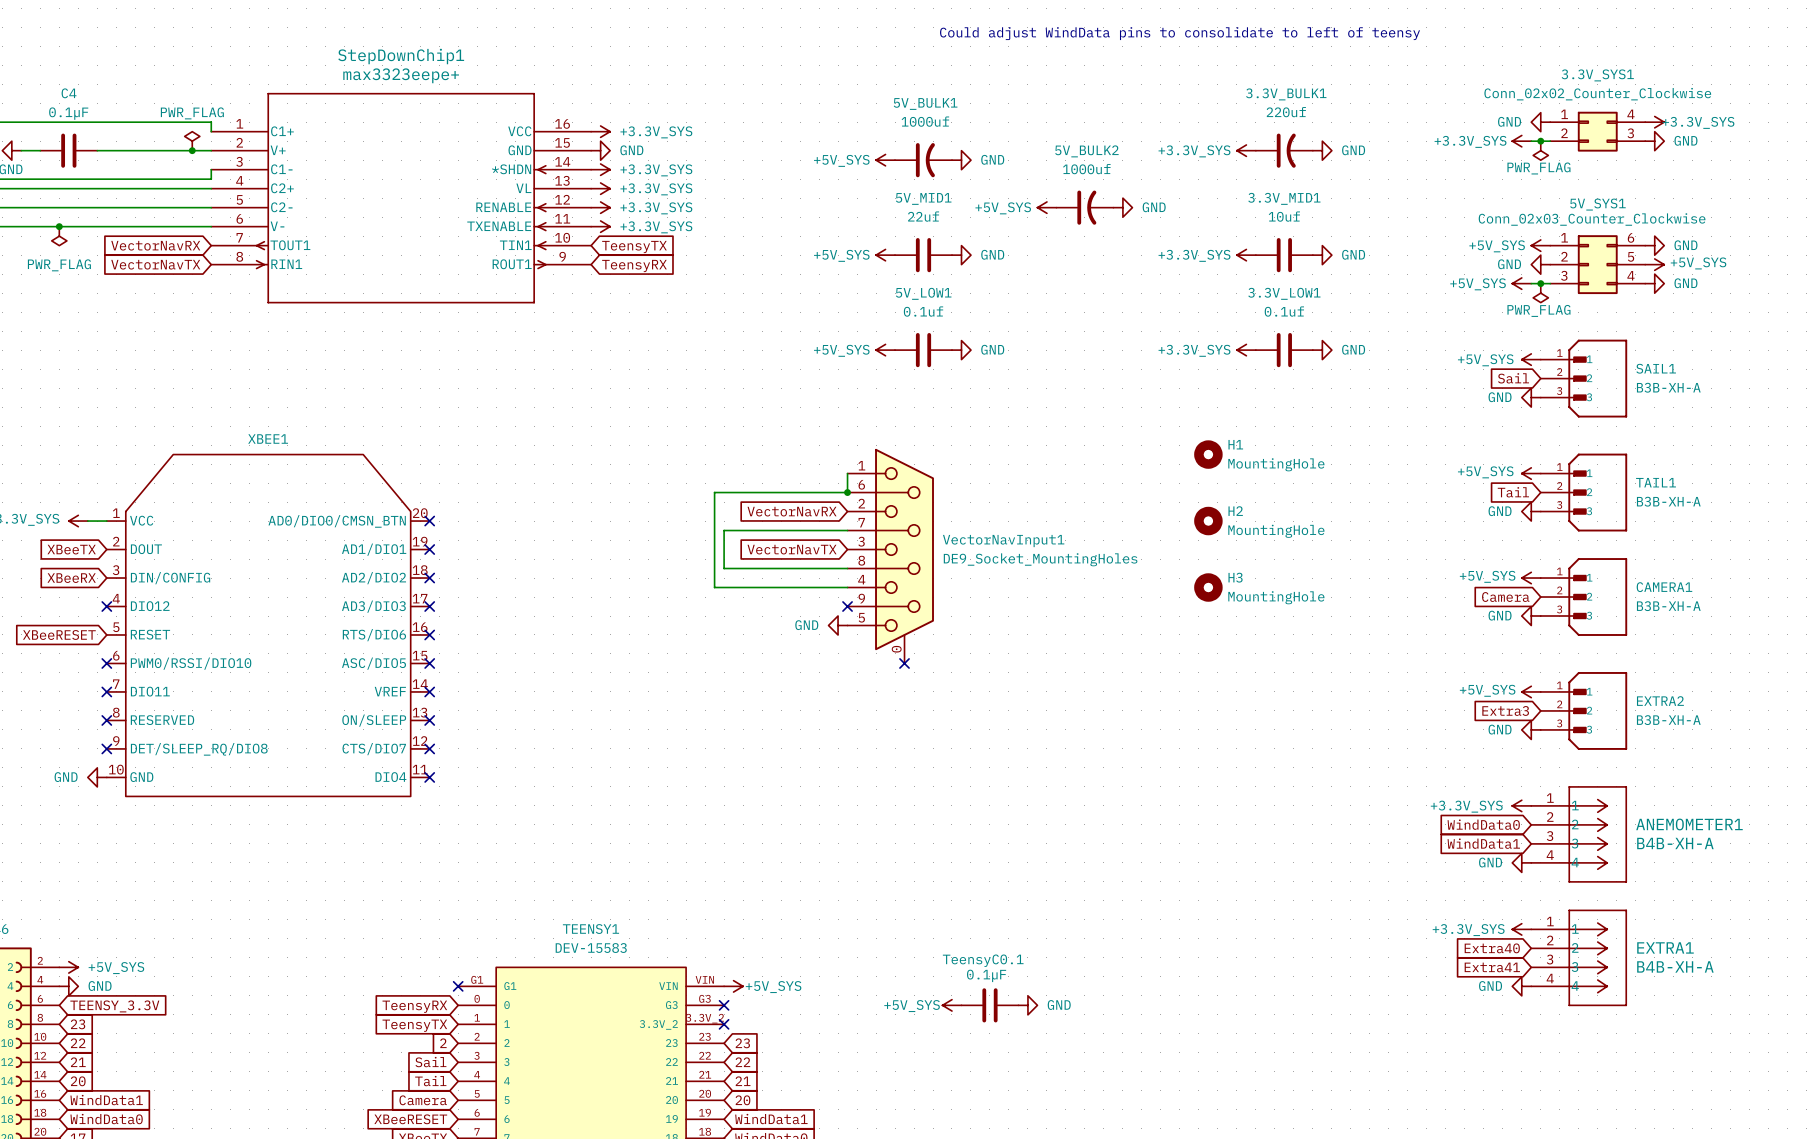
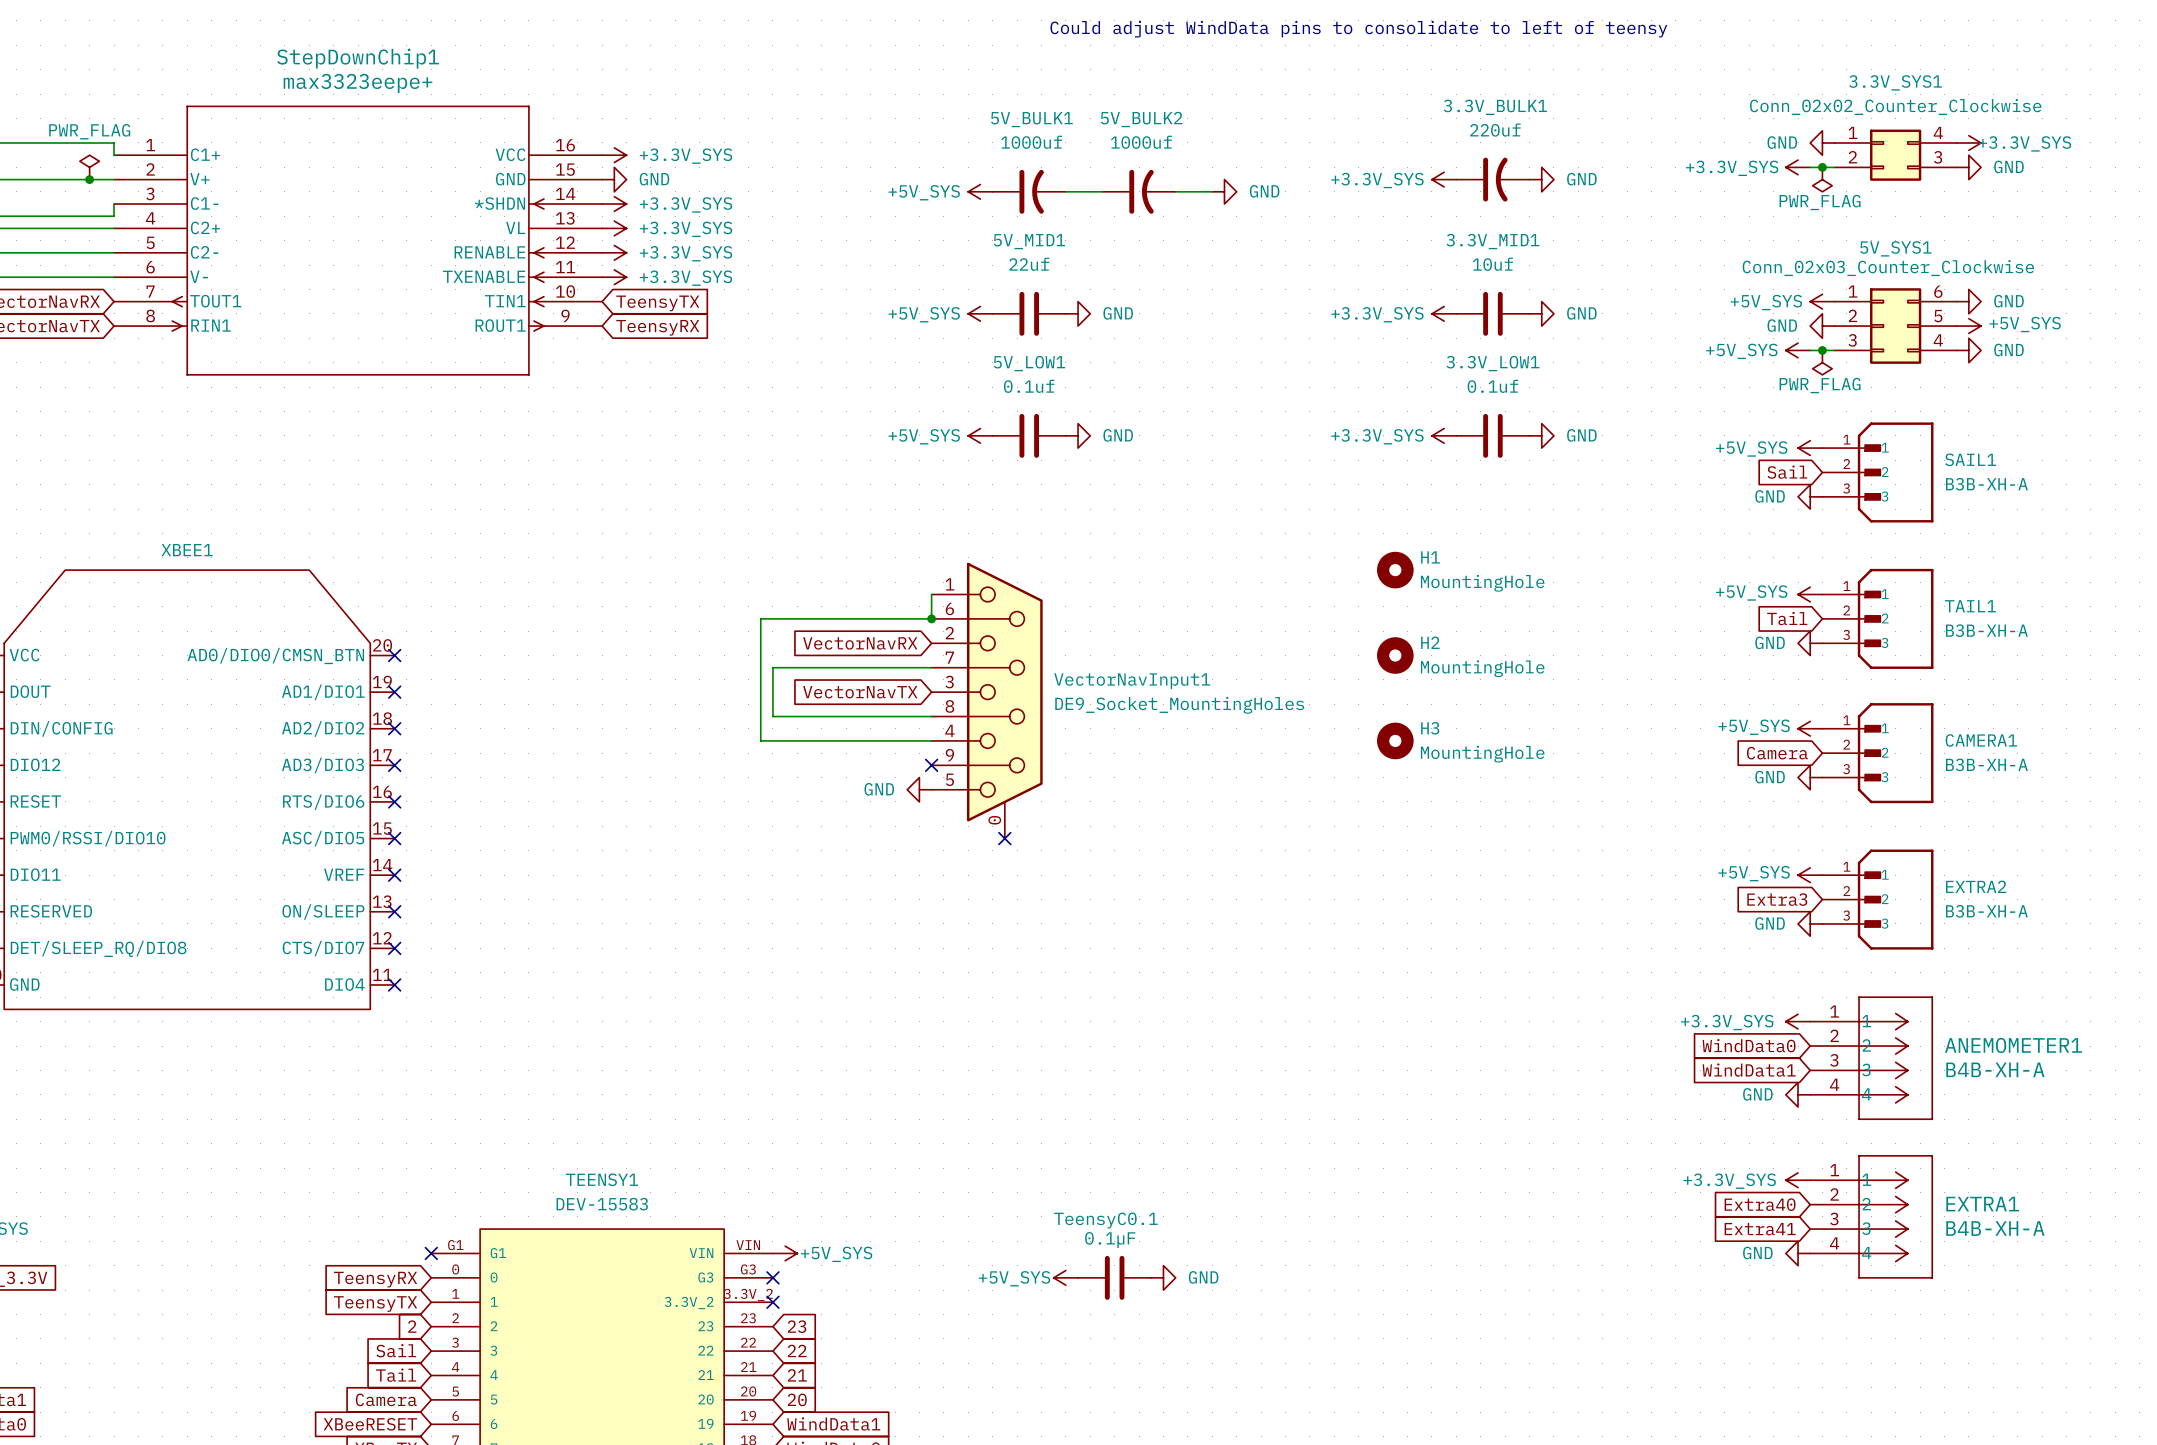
wire: none -> (1065, 191) (1102, 191)
power symbol: GND (961, 160) -> none
wire: none -> (1175, 191) (1212, 191)
power symbol: none -> GND (1224, 191)
power symbol: +5V_SYS (1046, 207) -> none
5V_BULK2 position: (1084, 207) -> (1139, 191)
power symbol: GND (1122, 207) -> none

